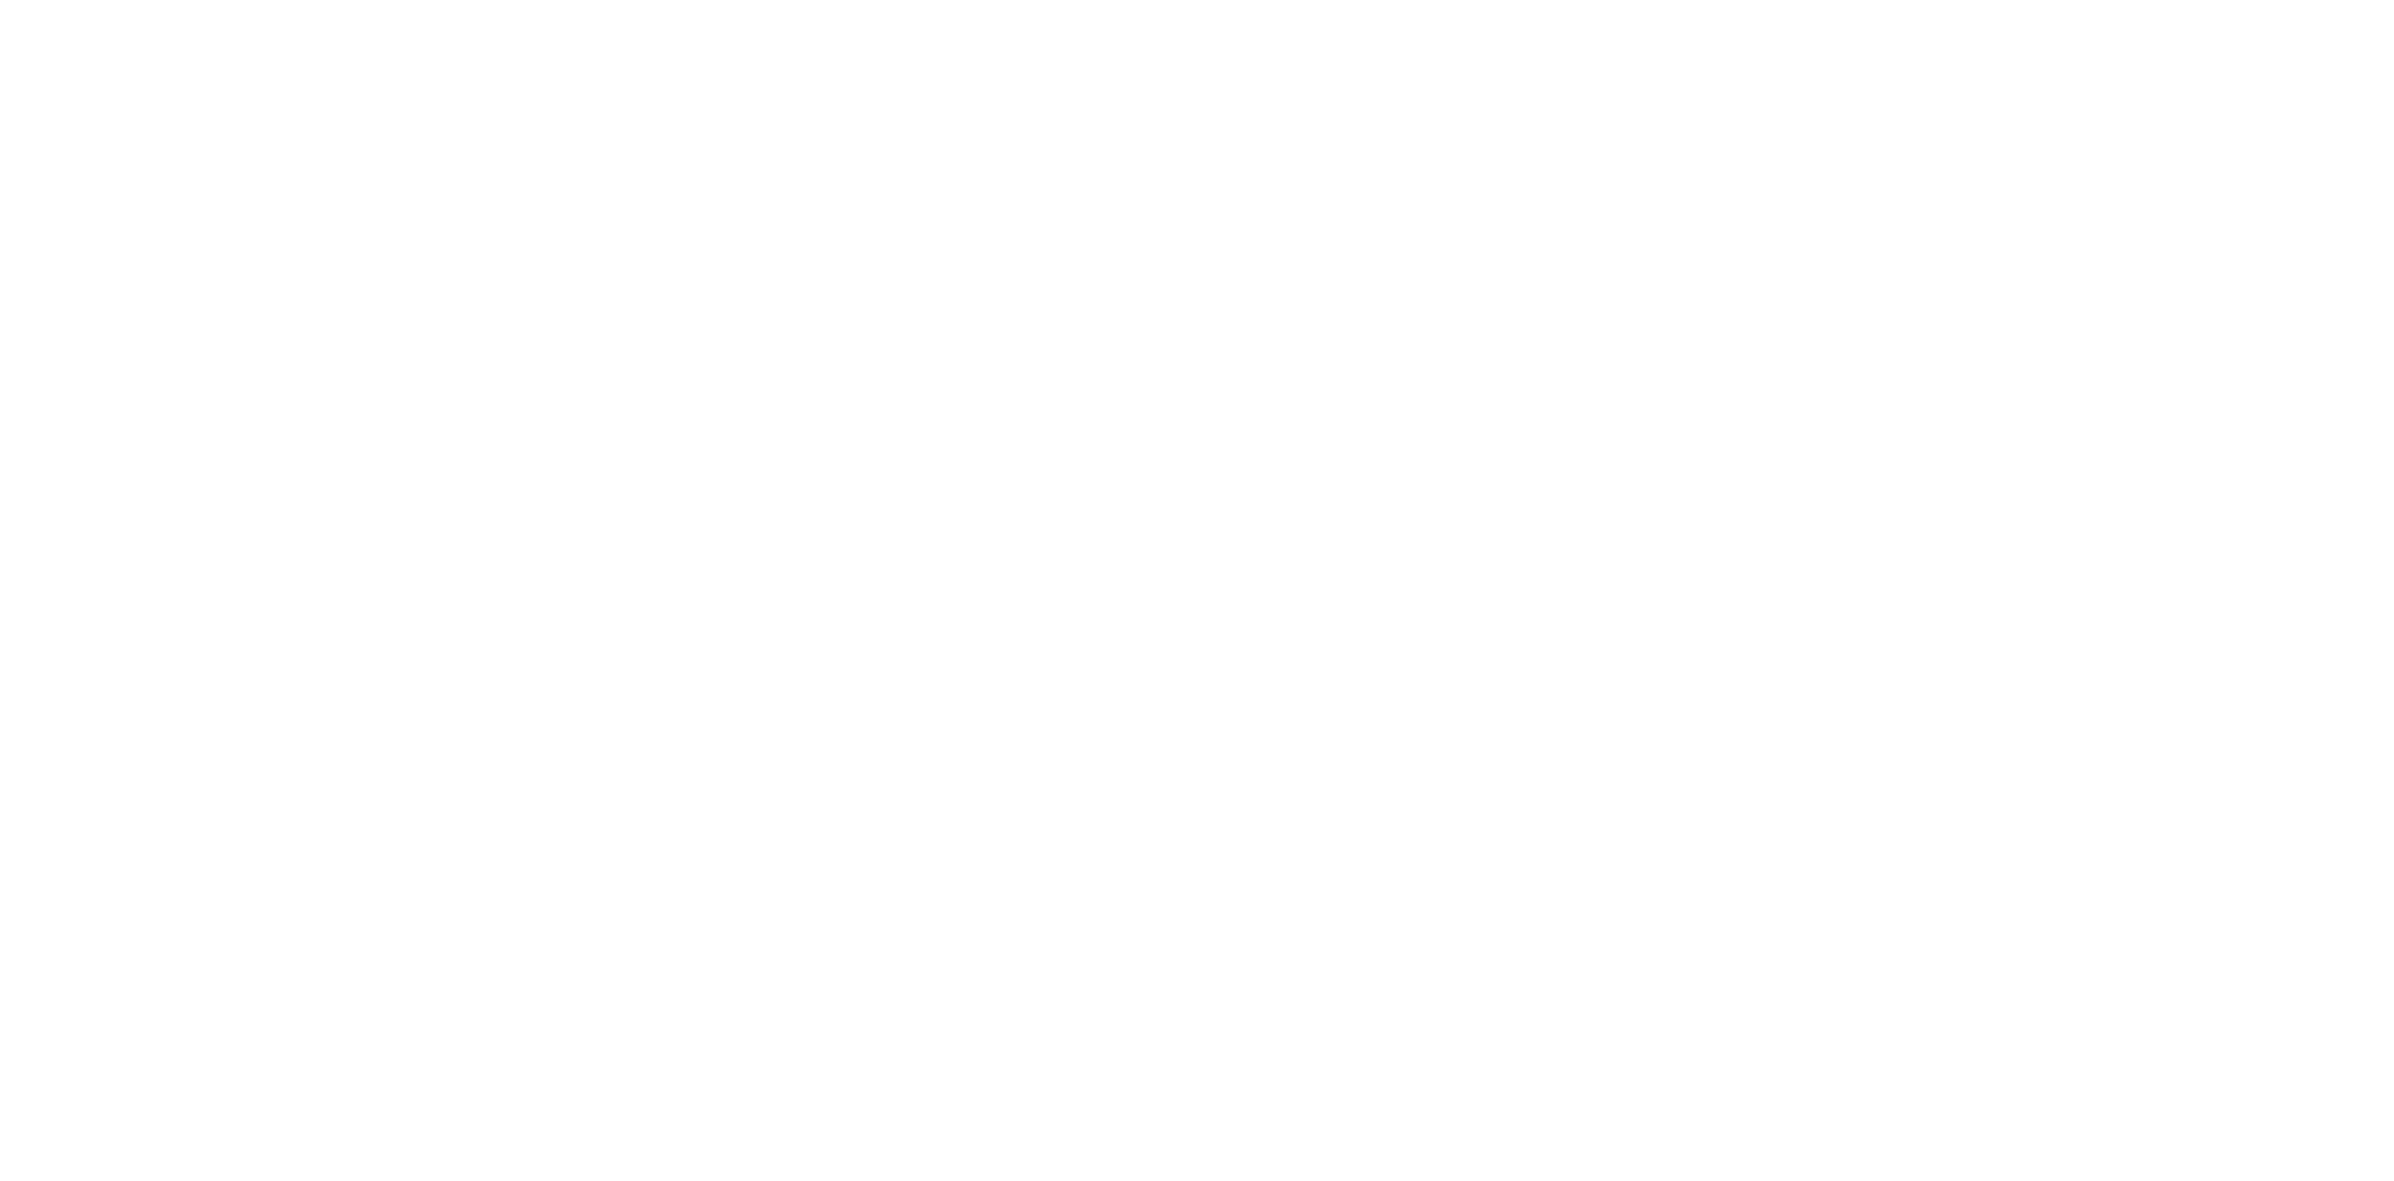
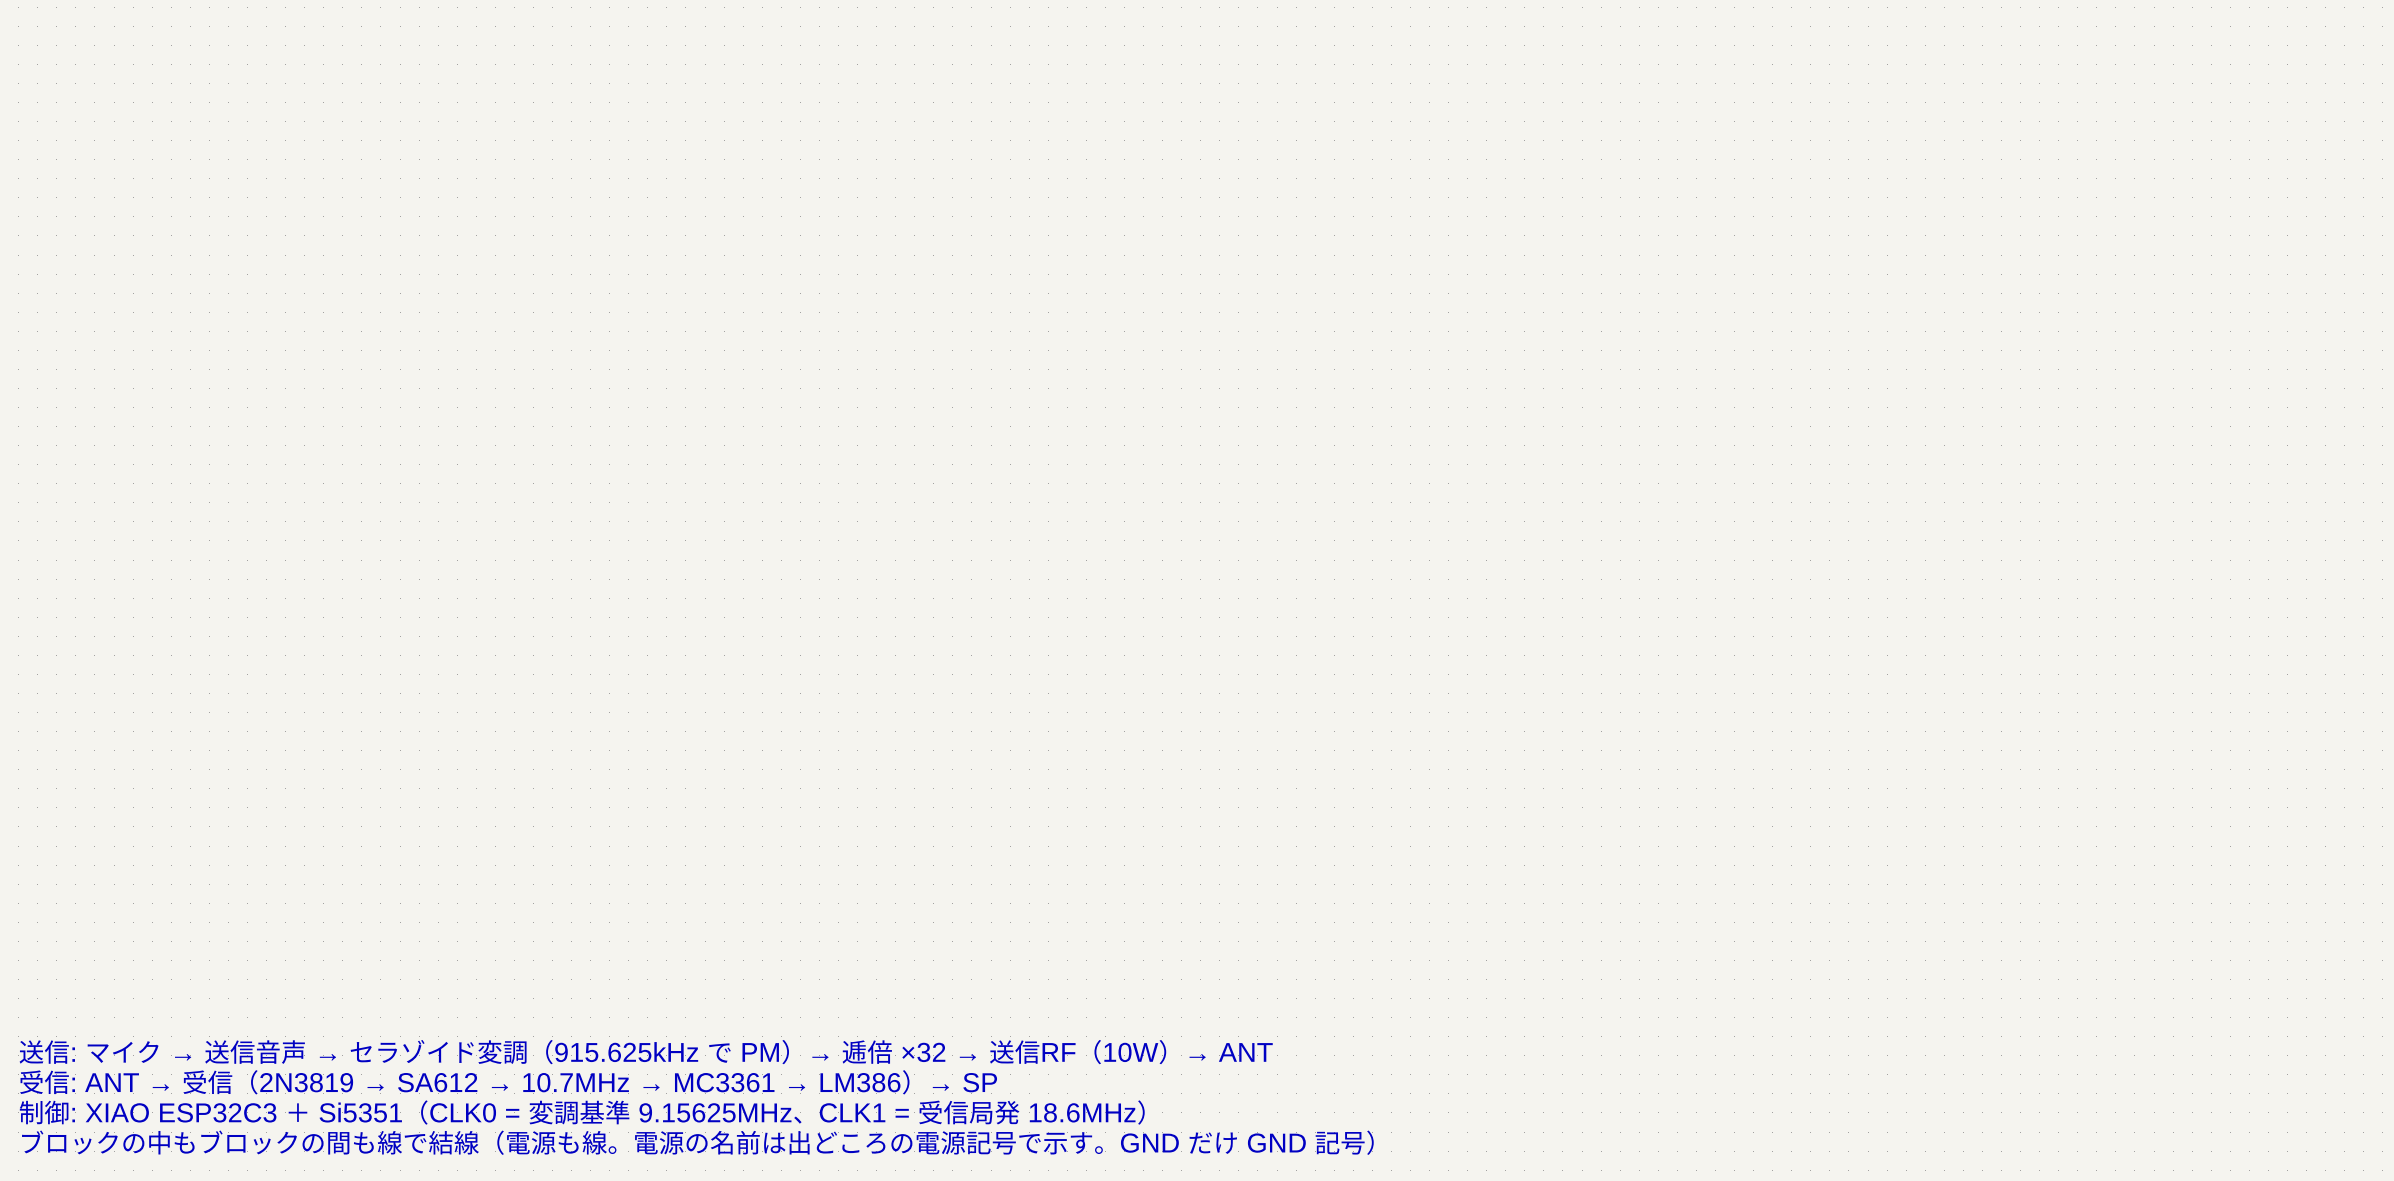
text: none -> 送信: マイク → 送信音声 → セラゾイド変調（915.625kHz で PM）→ 逓倍 ×32 → 送信RF（10W）→ ANT (646, 1052)
text: none -> 受信: ANT → 受信（2N3819 → SA612 → 10.7MHz → MC3361 → LM386）→ SP (508, 1082)
text: none -> 制御: XIAO ESP32C3 ＋ Si5351（CLK0 = 変調基準 9.15625MHz、CLK1 = 受信局発 18.6MHz） (582, 1112)
text: none -> ブロックの中もブロックの間も線で結線（電源も線。電源の名前は出どころの電源記号で示す。GND だけ GND 記号） (697, 1142)

